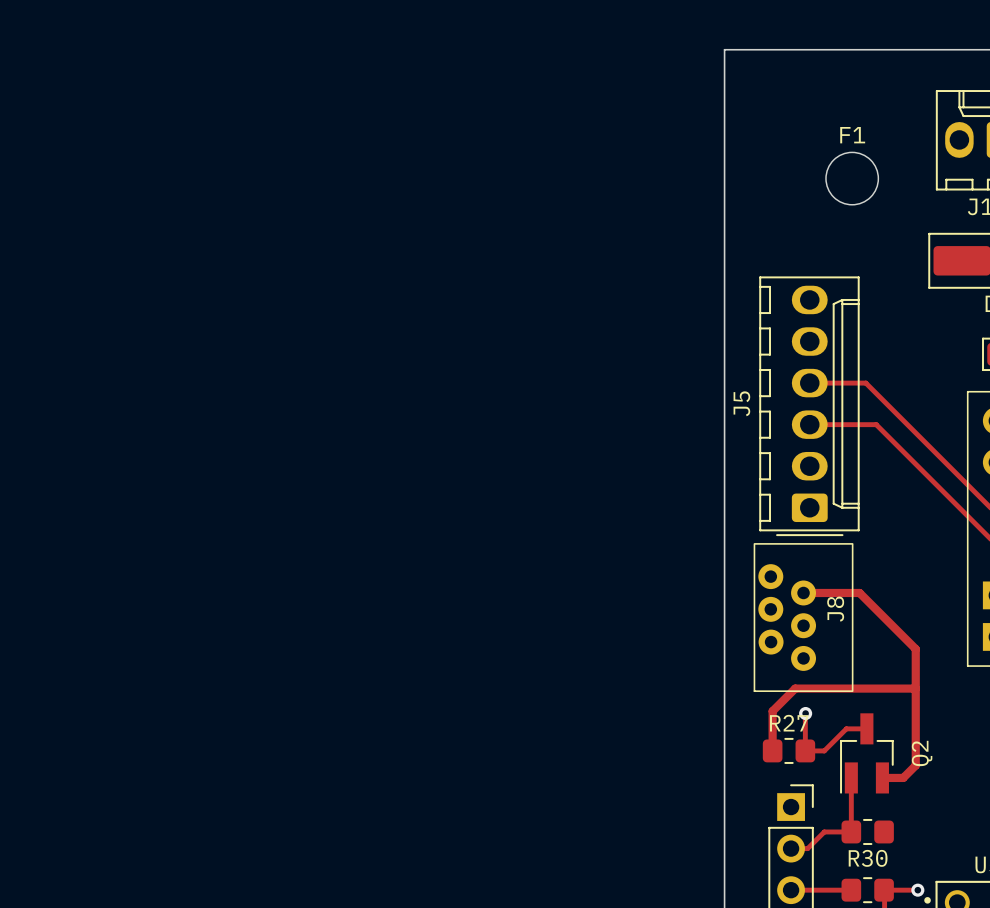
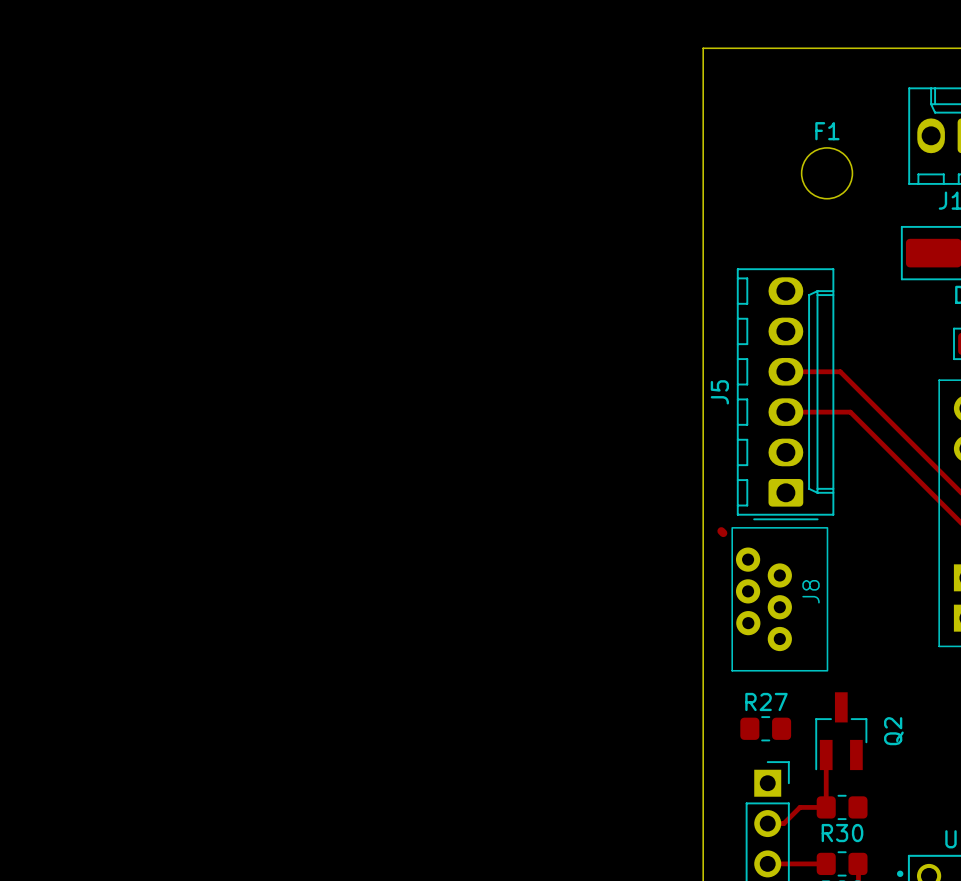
track: none -> (721, 531) (723, 533)
track: (803, 592) (859, 592) (915, 649) (915, 765) (903, 777) (882, 777) -> none
track: (915, 688) (795, 688) (772, 711) (772, 750) -> none
via: (805, 713) -> none
track: (805, 715) (807, 713) (805, 715) (805, 750) (824, 750) (846, 728) (866, 728) -> none
track: (884, 890) (917, 890) -> none
via: (917, 890) -> none

